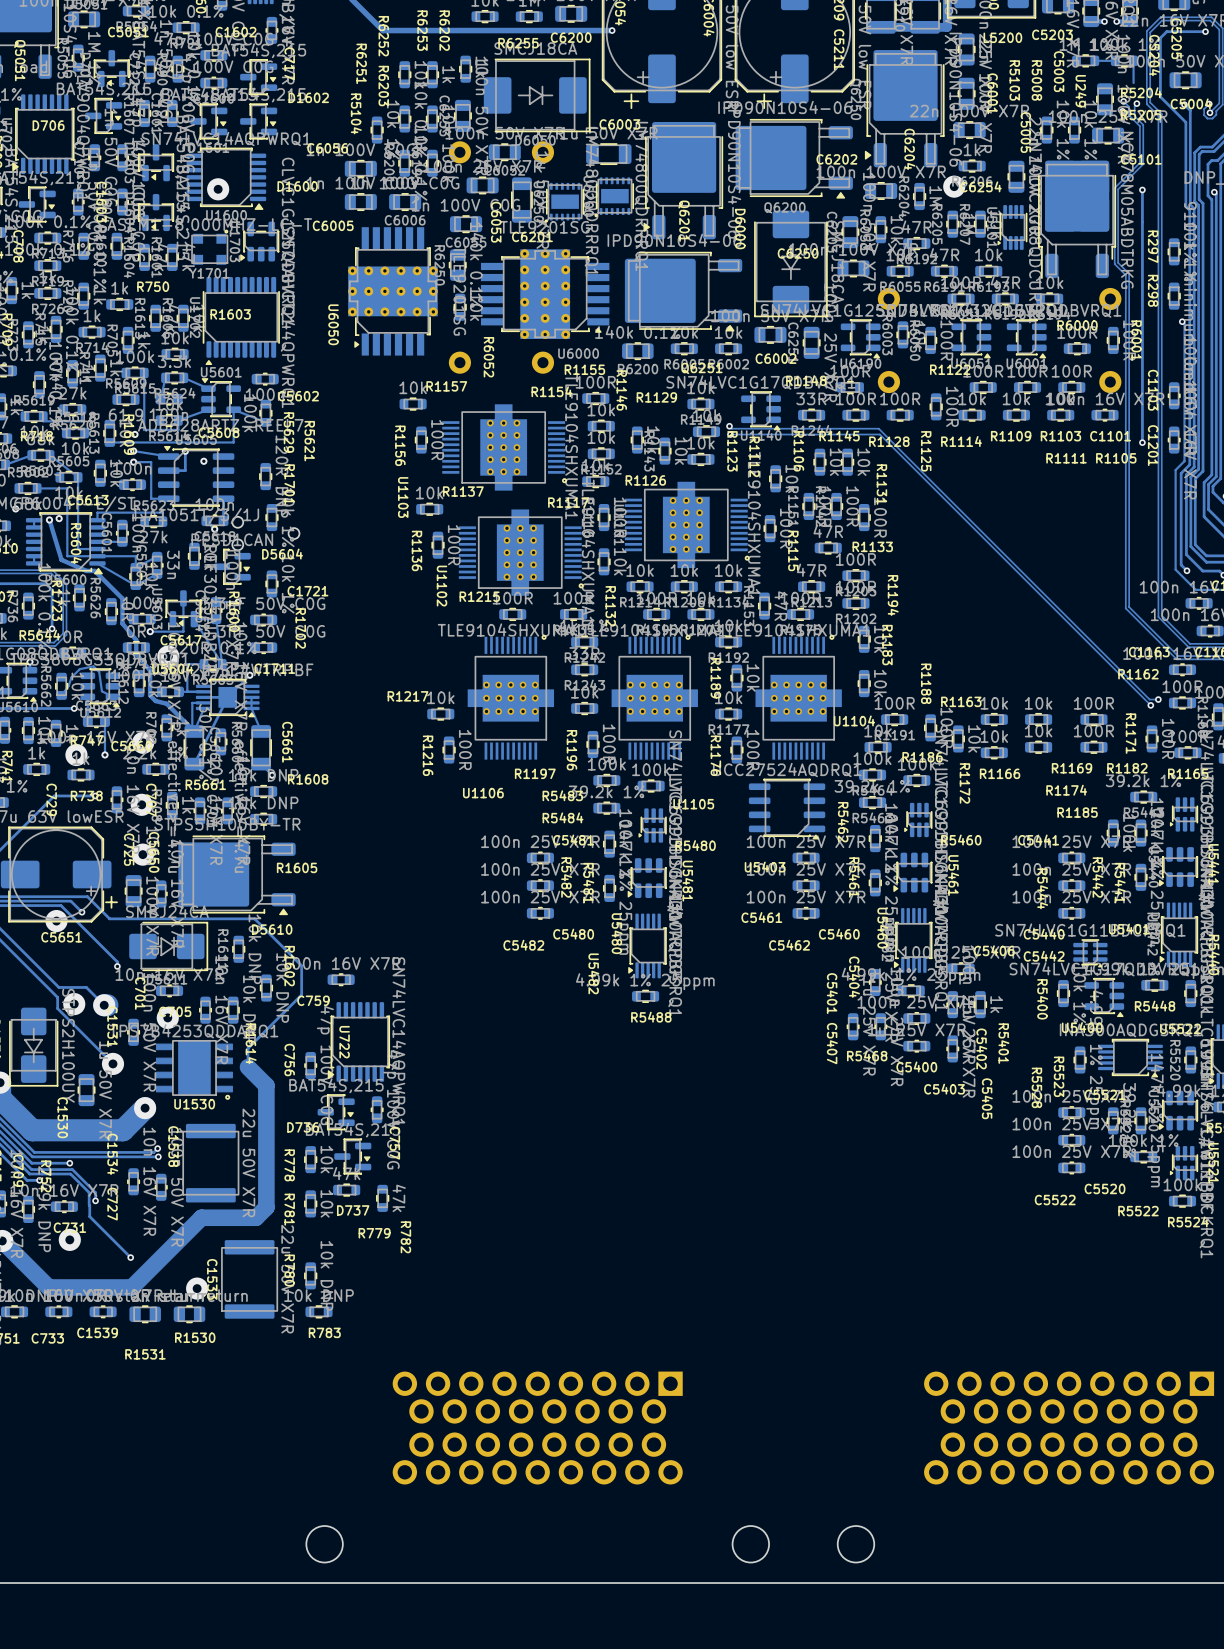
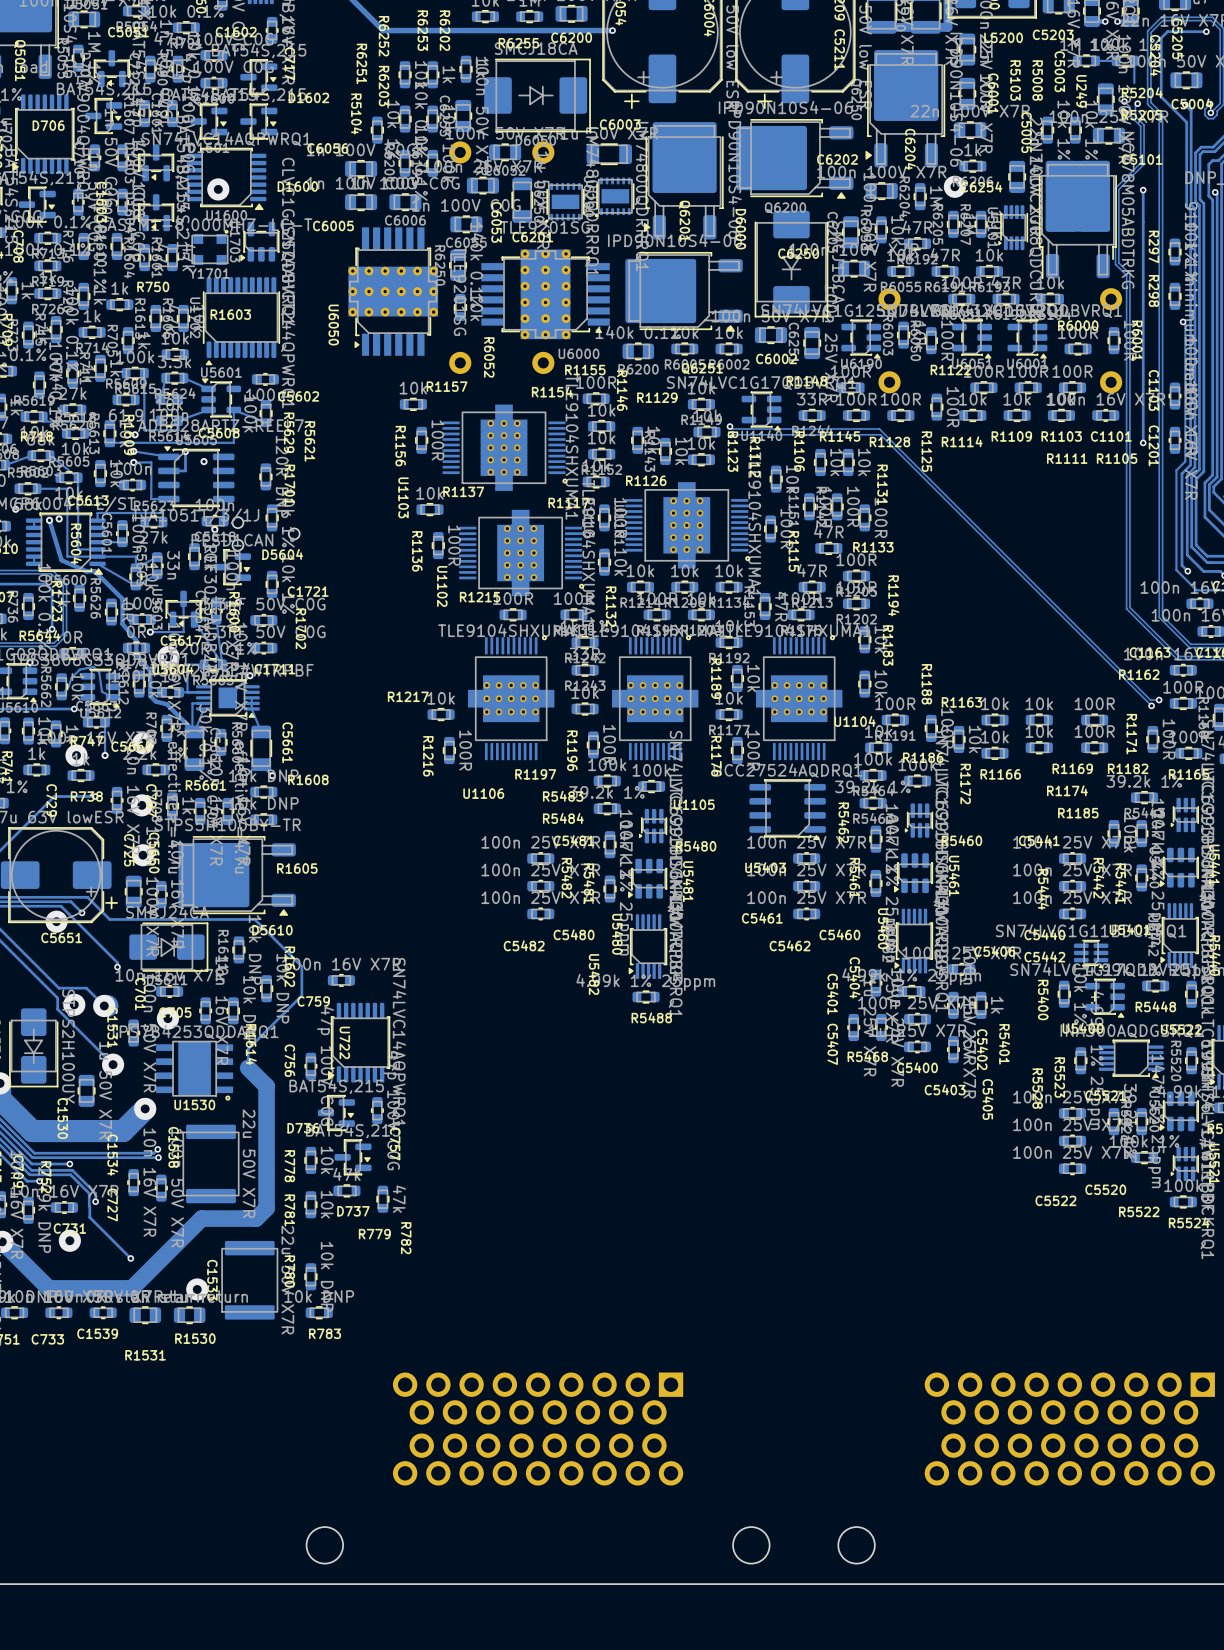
track: (203, 697) (227, 697) (194, 764) -> none

